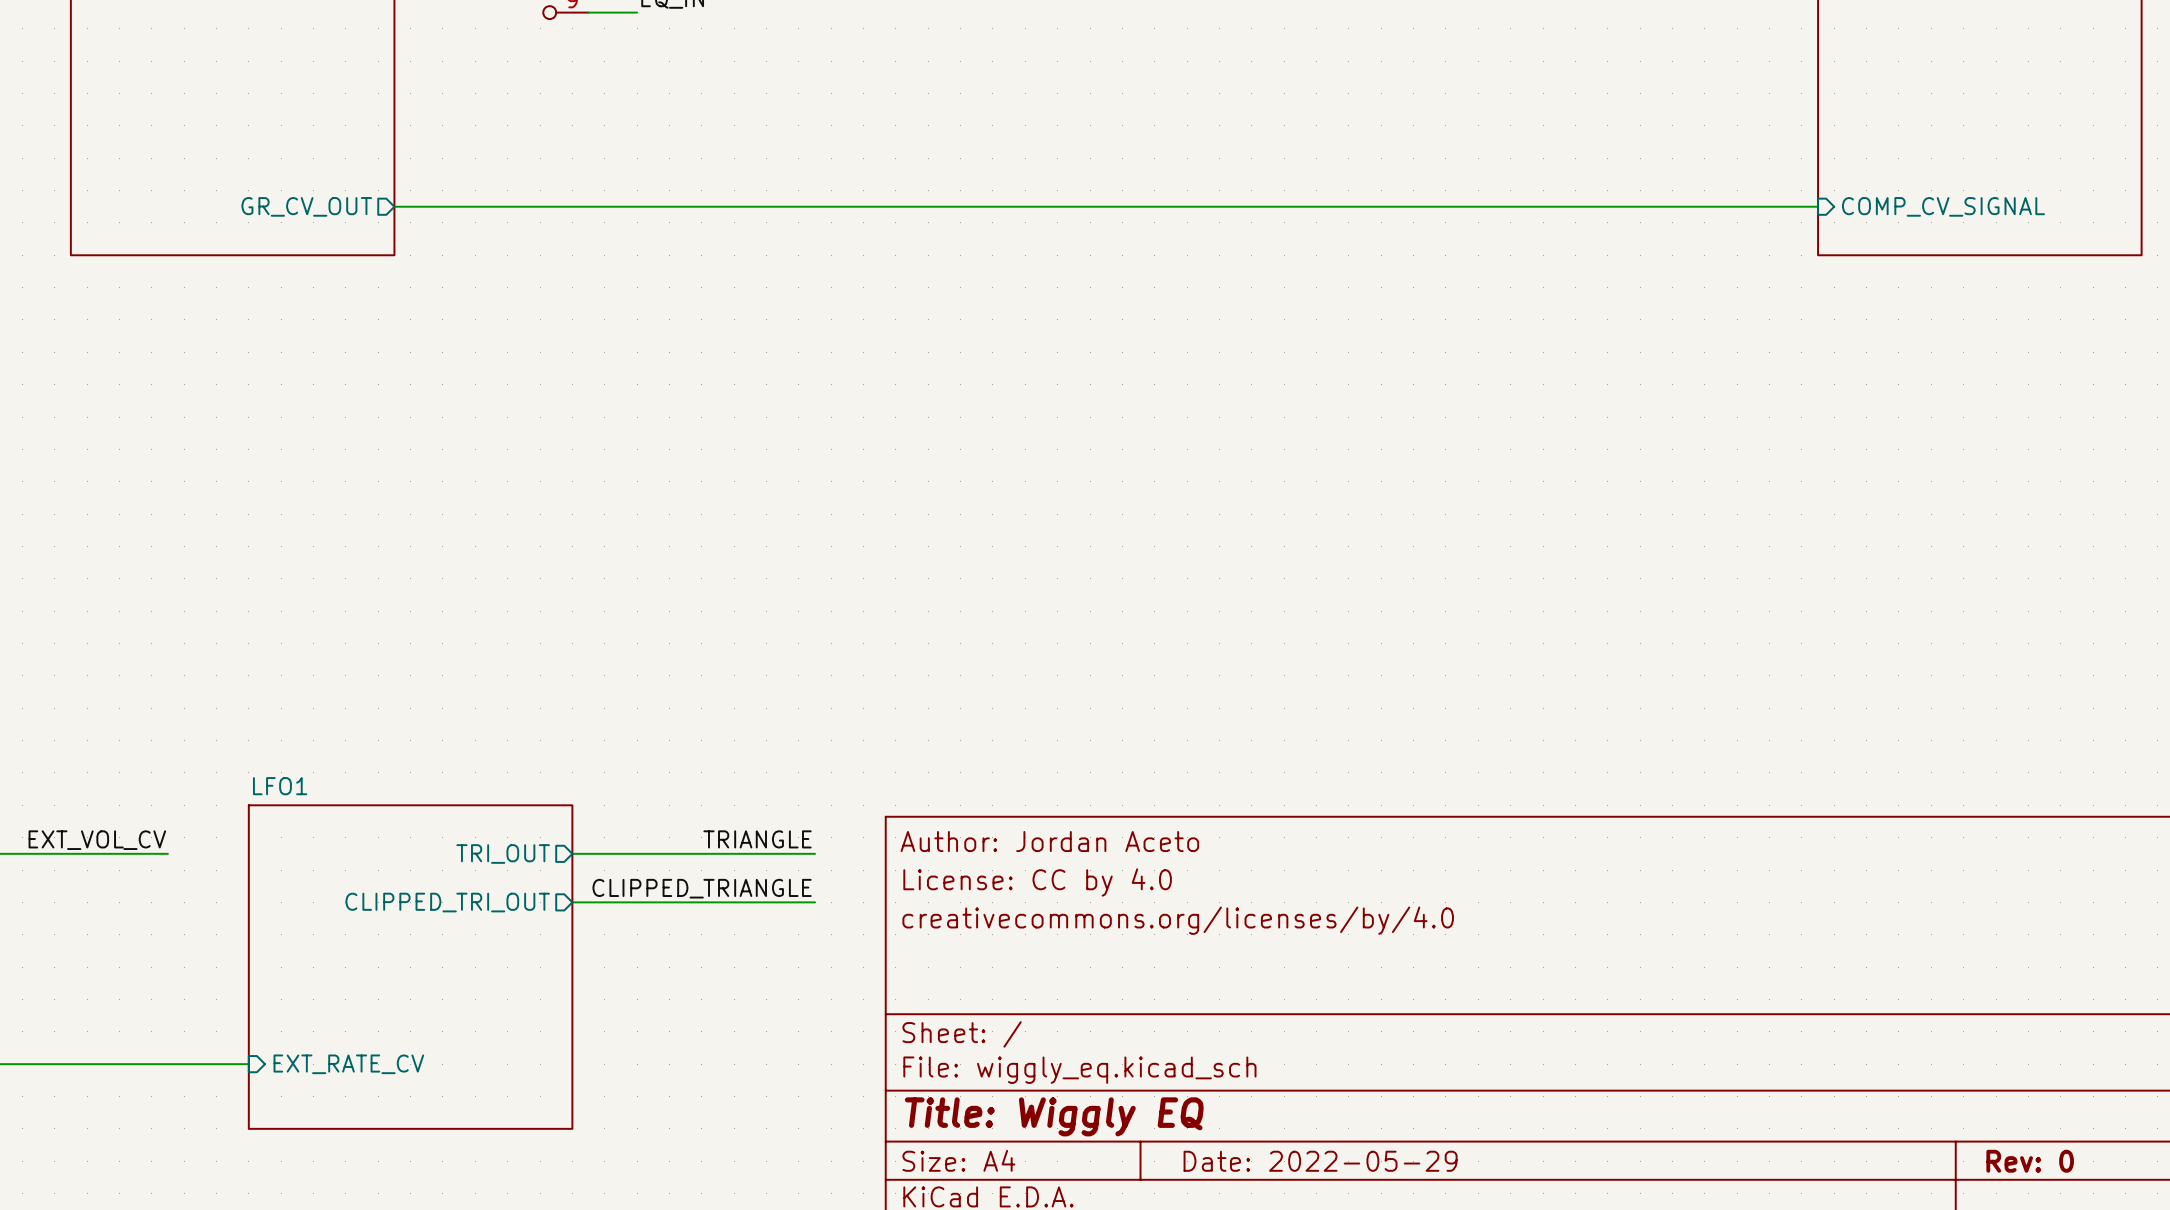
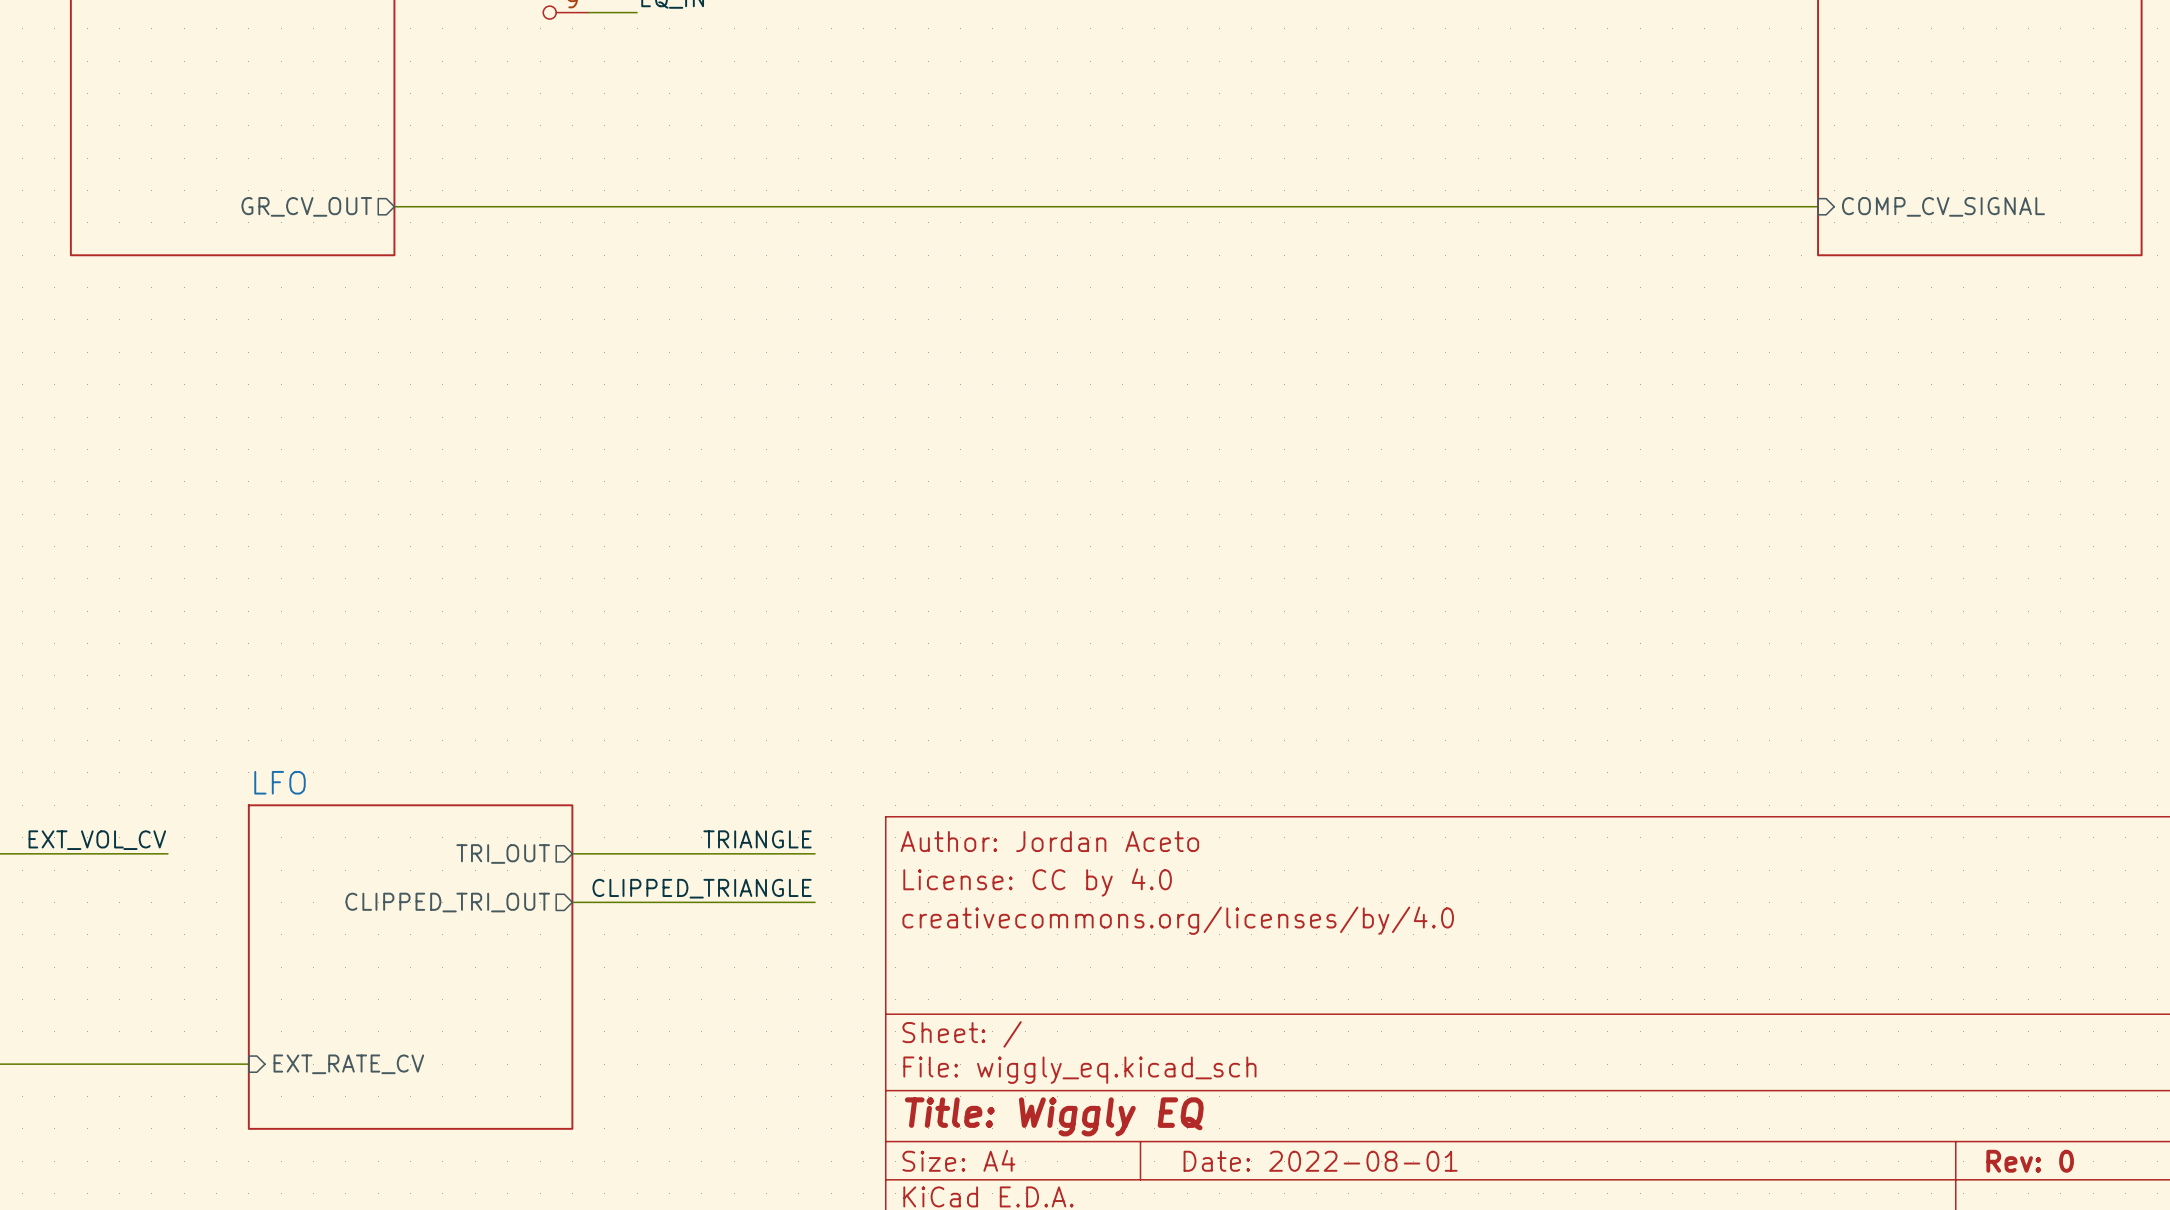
sheet LFO1 name: LFO1 (280, 786) -> LFO (280, 782)
title block: Date: 2022-05-29 (1320, 1161) -> Date: 2022-08-01 (1320, 1161)

